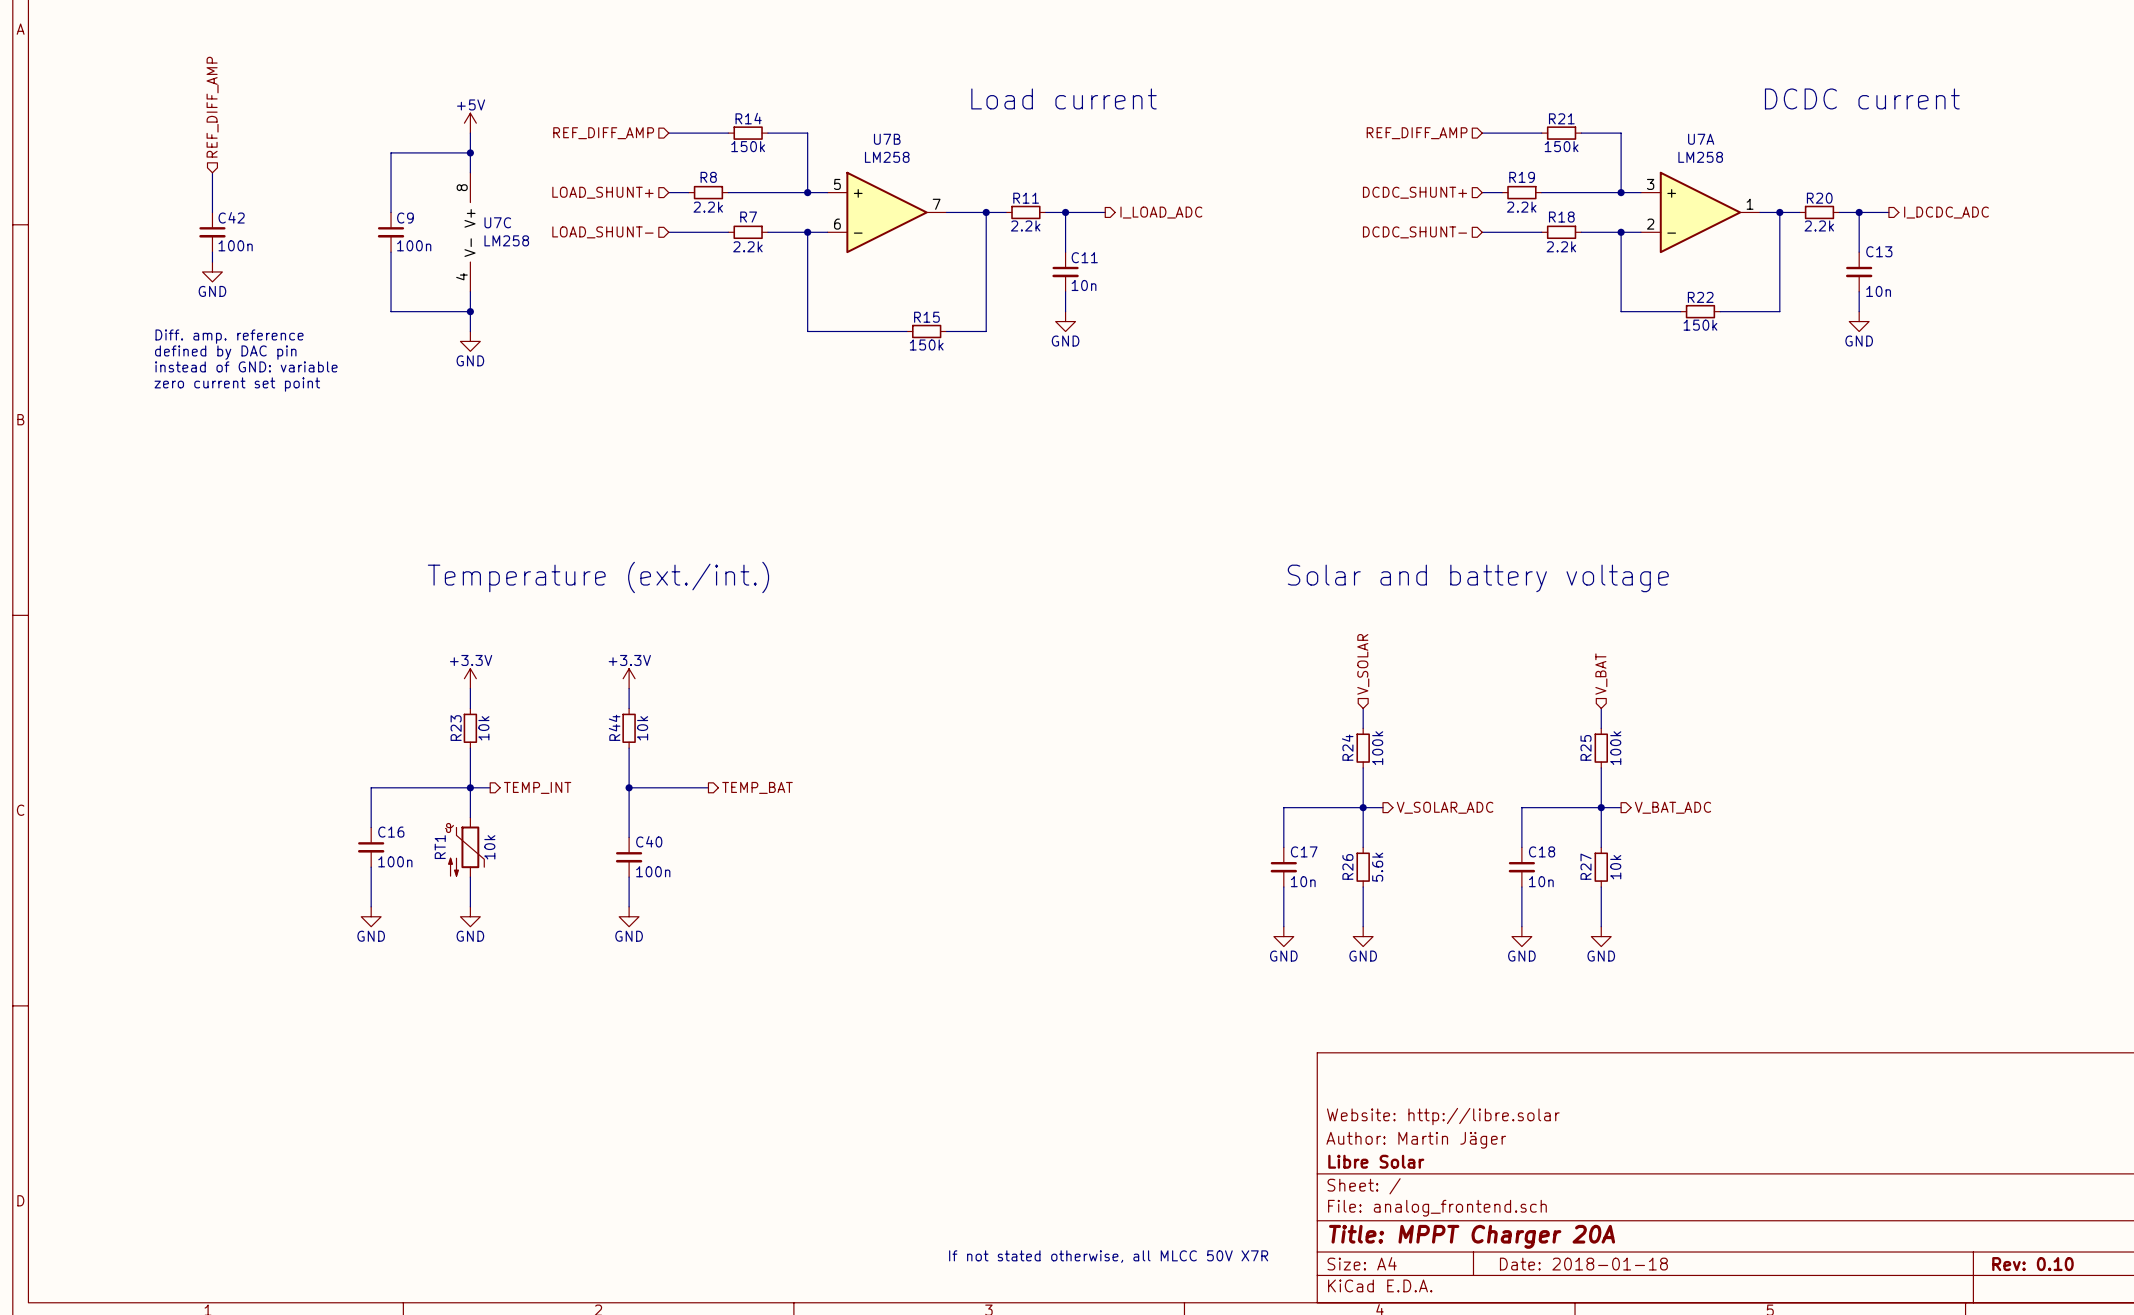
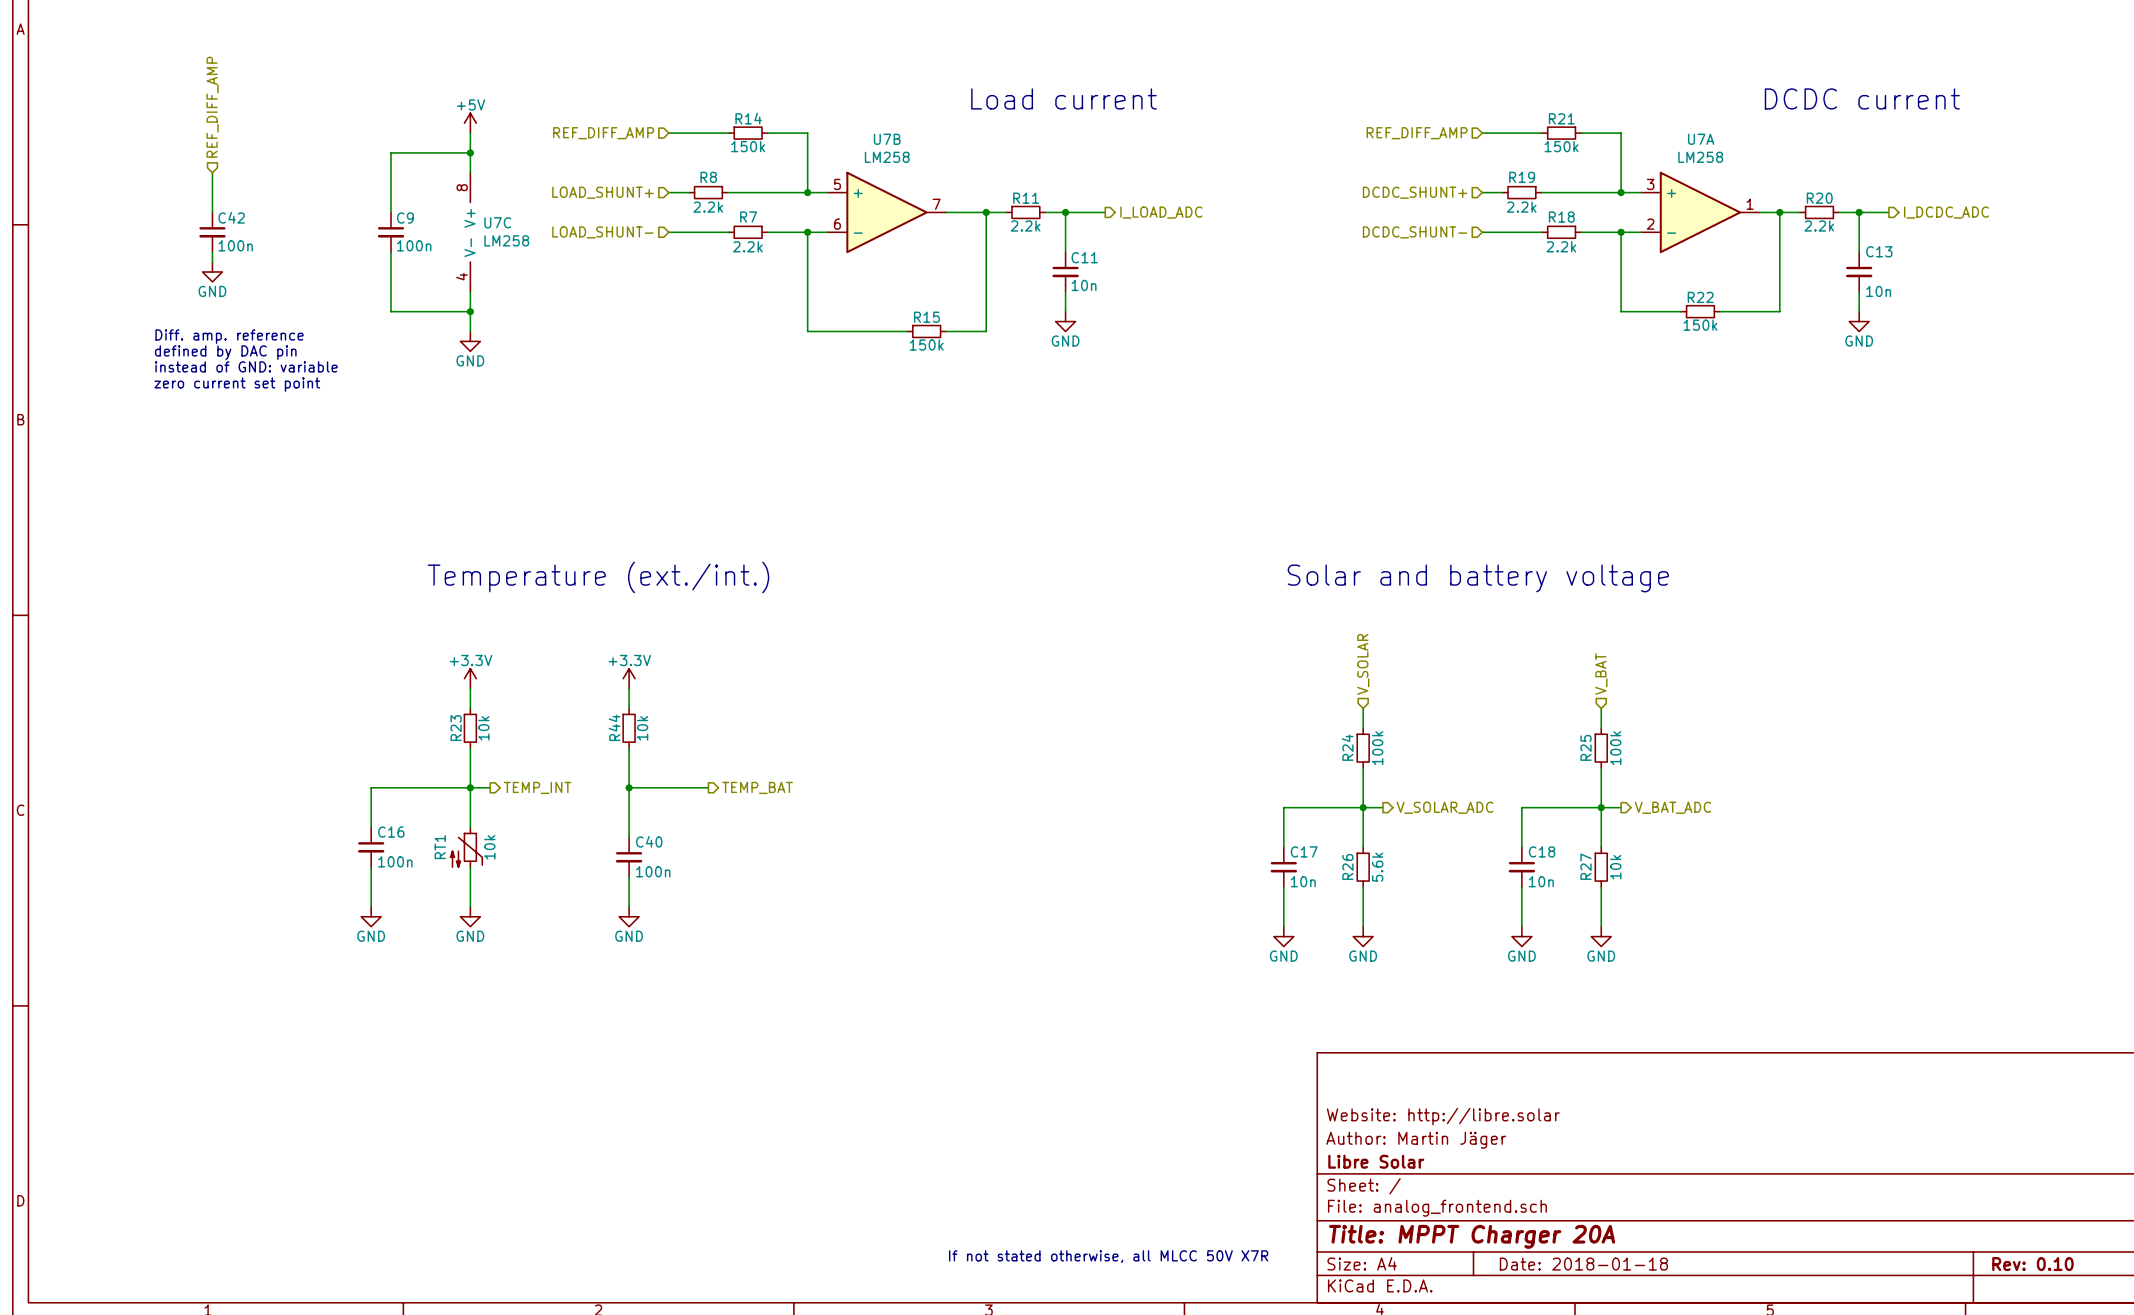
RT1 symbol: [445, 817, 485, 878] -> [450, 827, 483, 868]

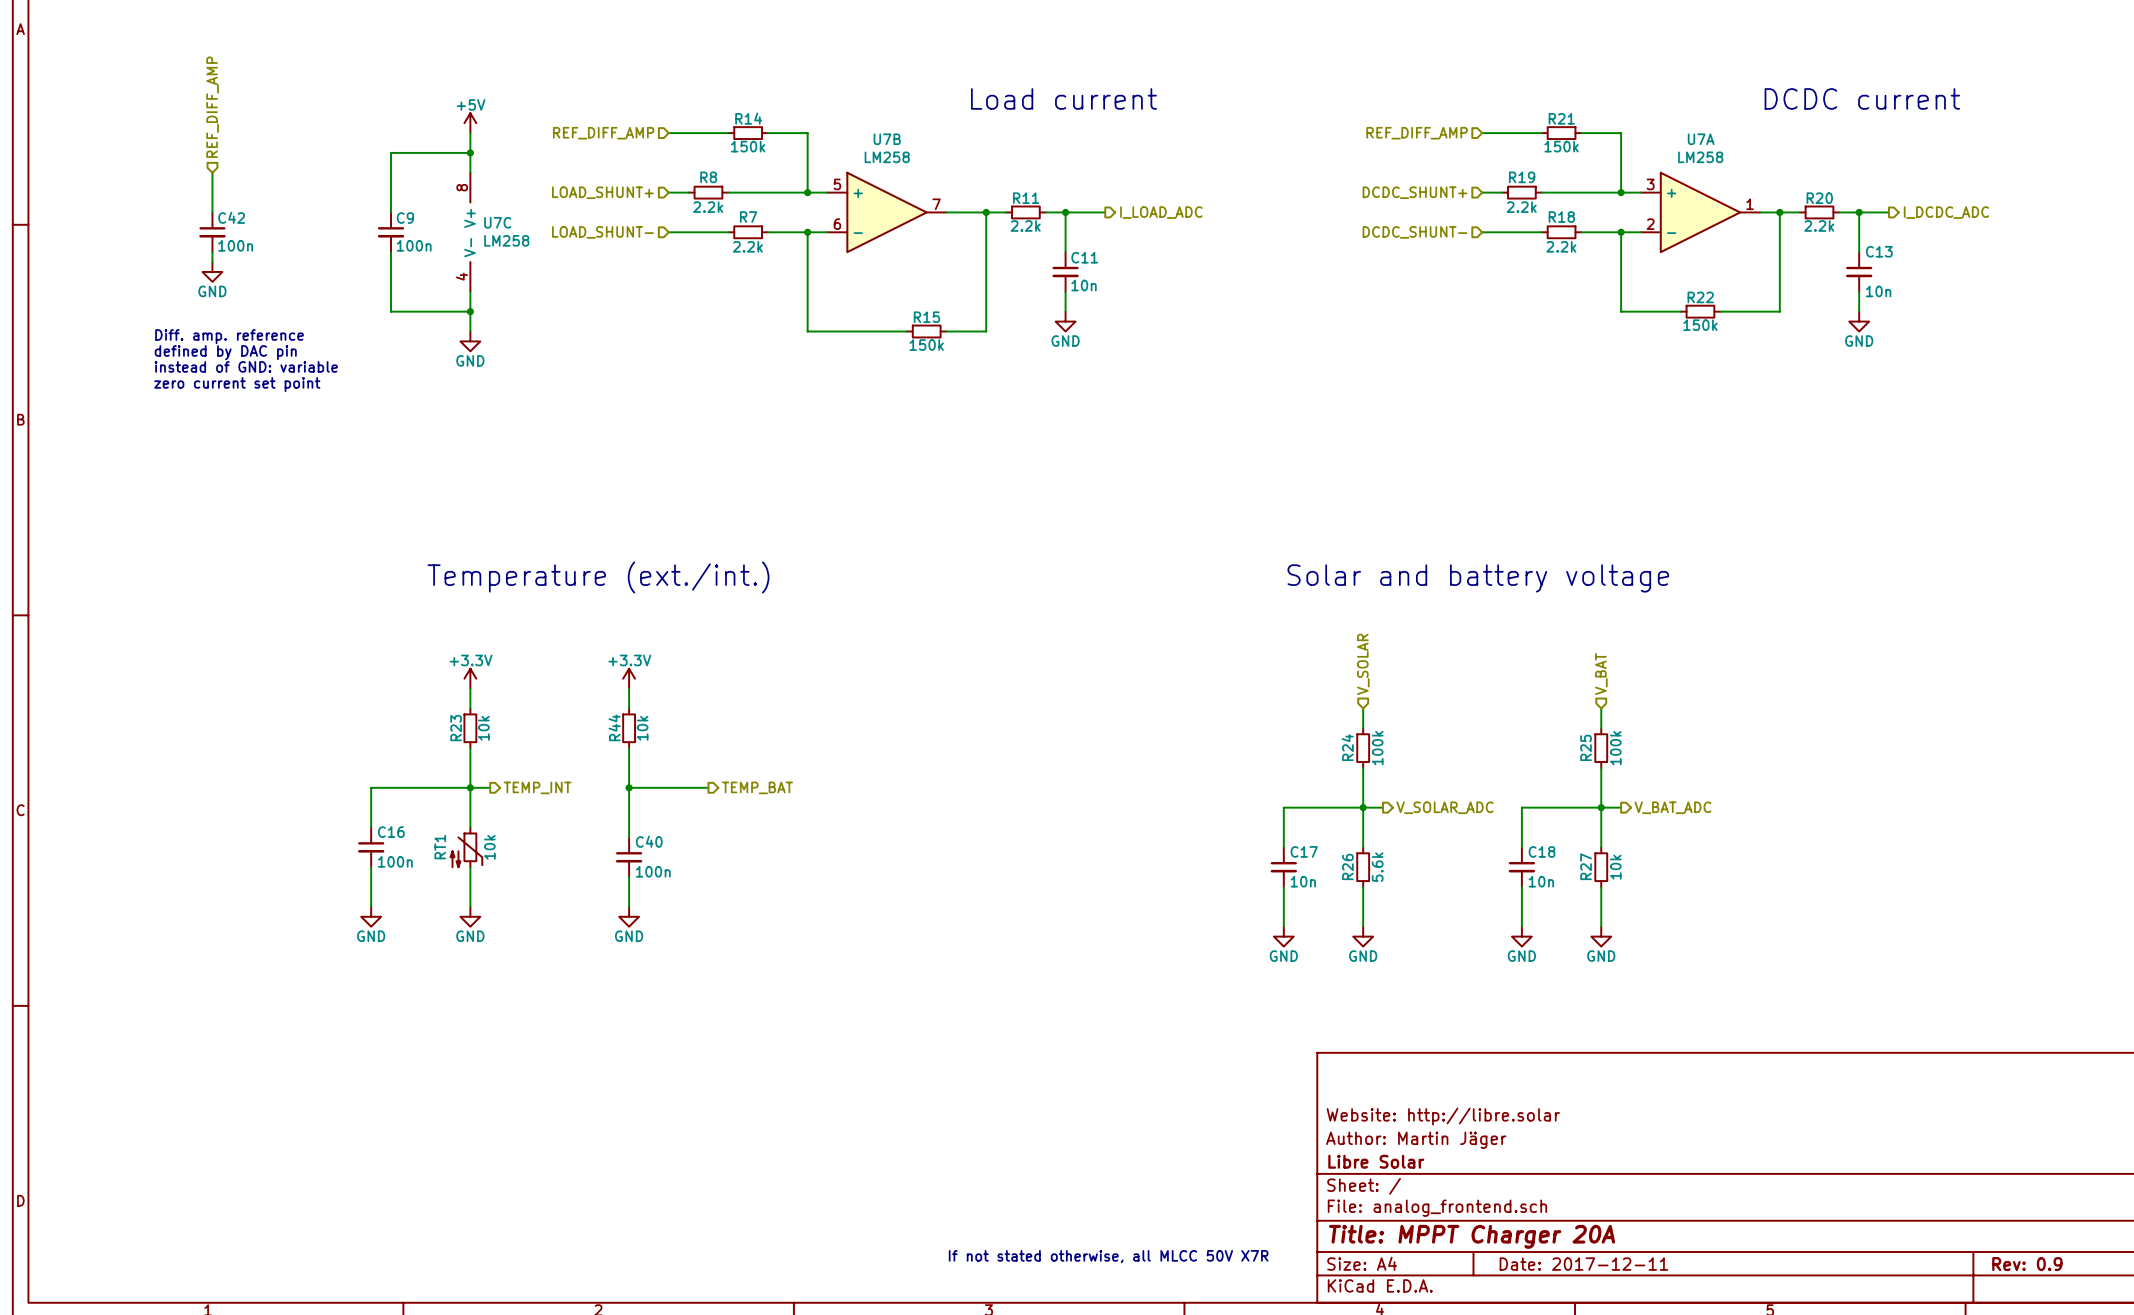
title block: Date: 2018-01-18 (1583, 1264) -> Date: 2017-12-11 (1583, 1264)
title block: Rev: 0.10 (2032, 1264) -> Rev: 0.9 (2027, 1264)

